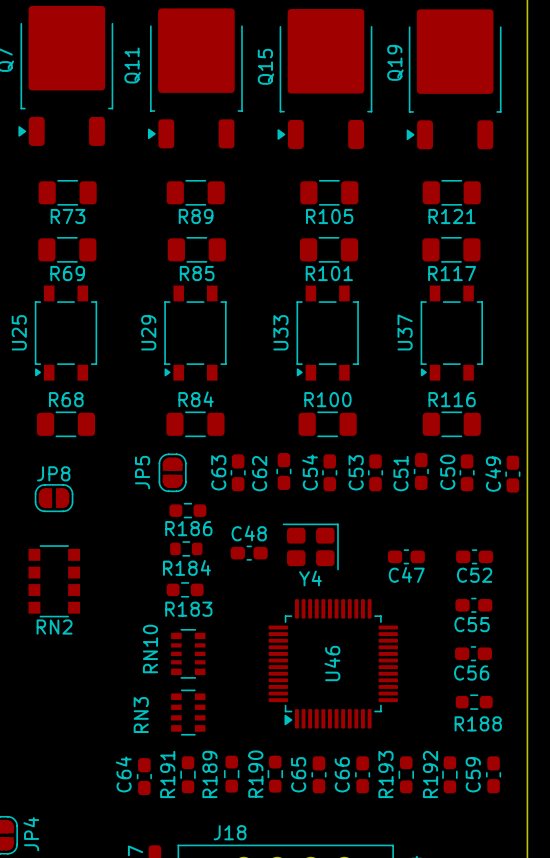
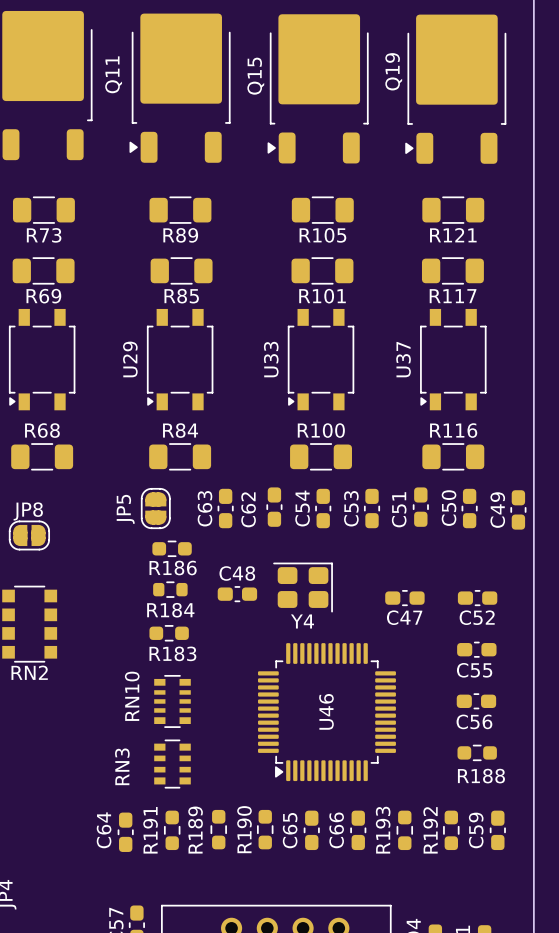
J18 name: J18 (230, 832) -> none

